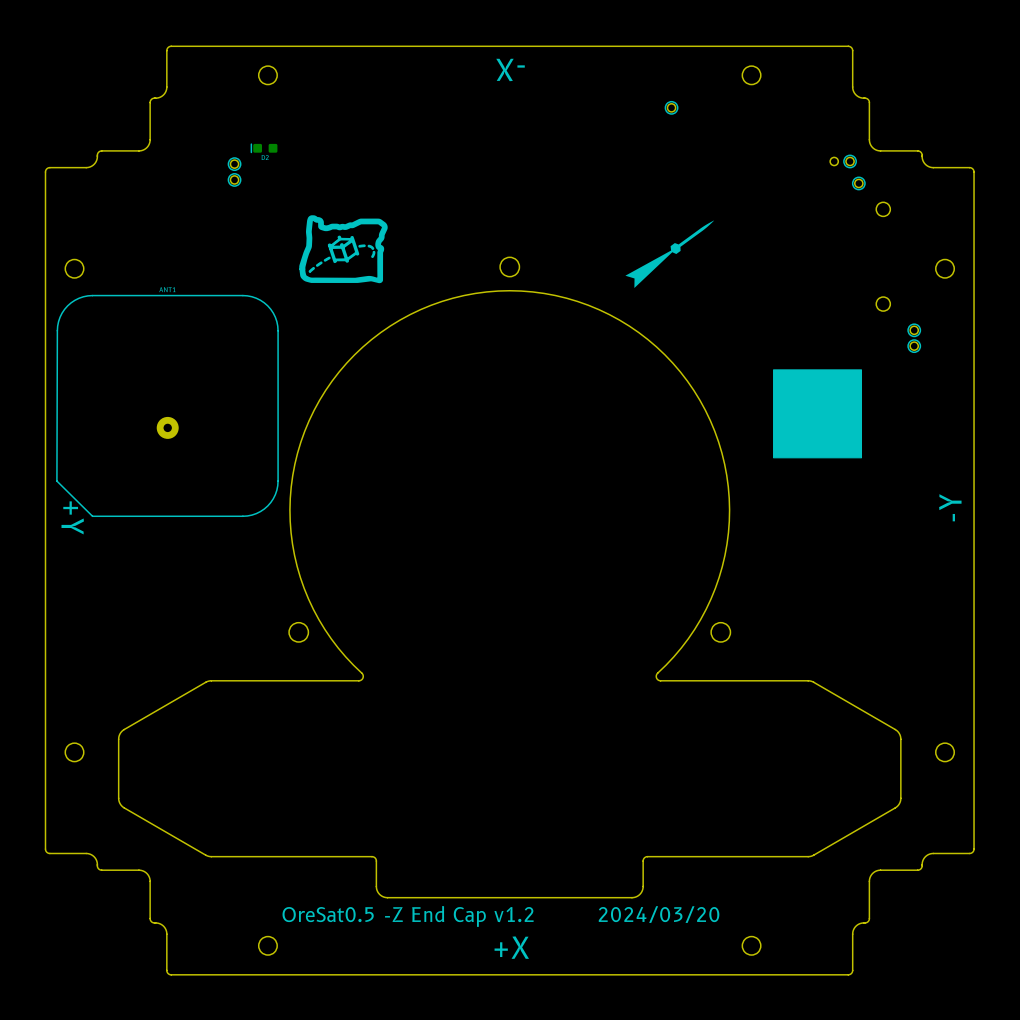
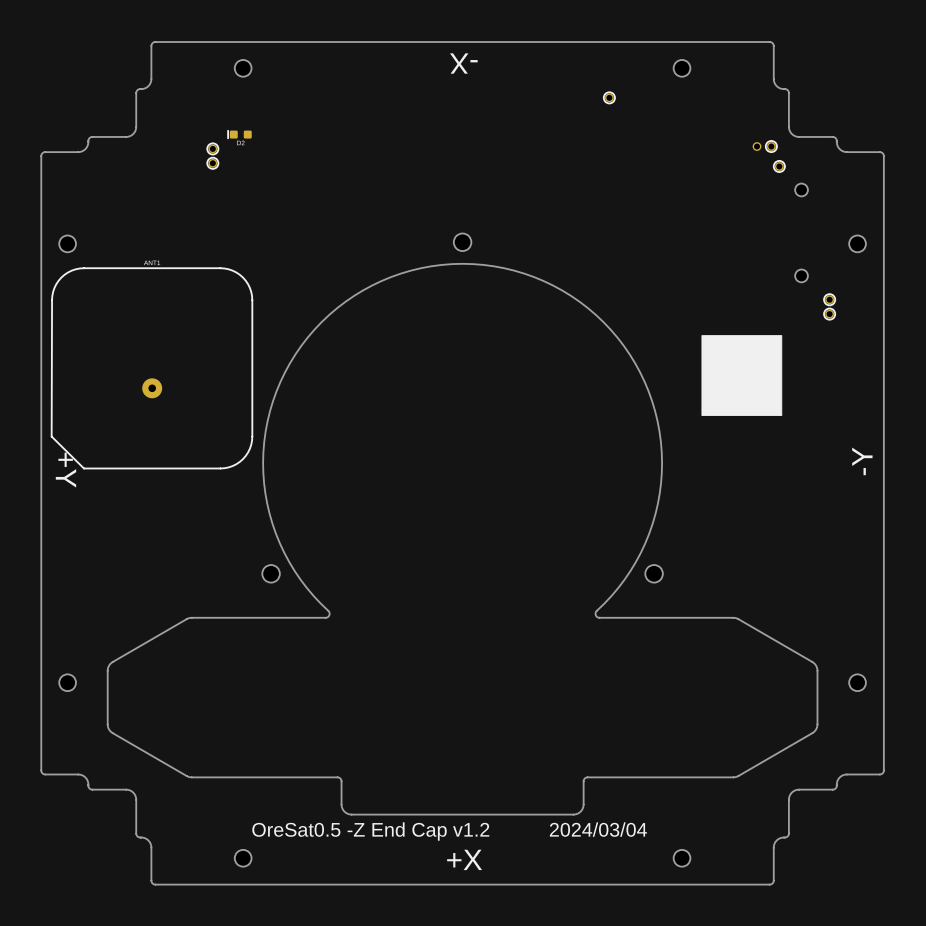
drawing: [299, 215, 388, 284] -> none
drawing: [625, 220, 715, 289] -> none
text: 2024/03/20 (659, 914) -> 2024/03/04 (598, 829)

